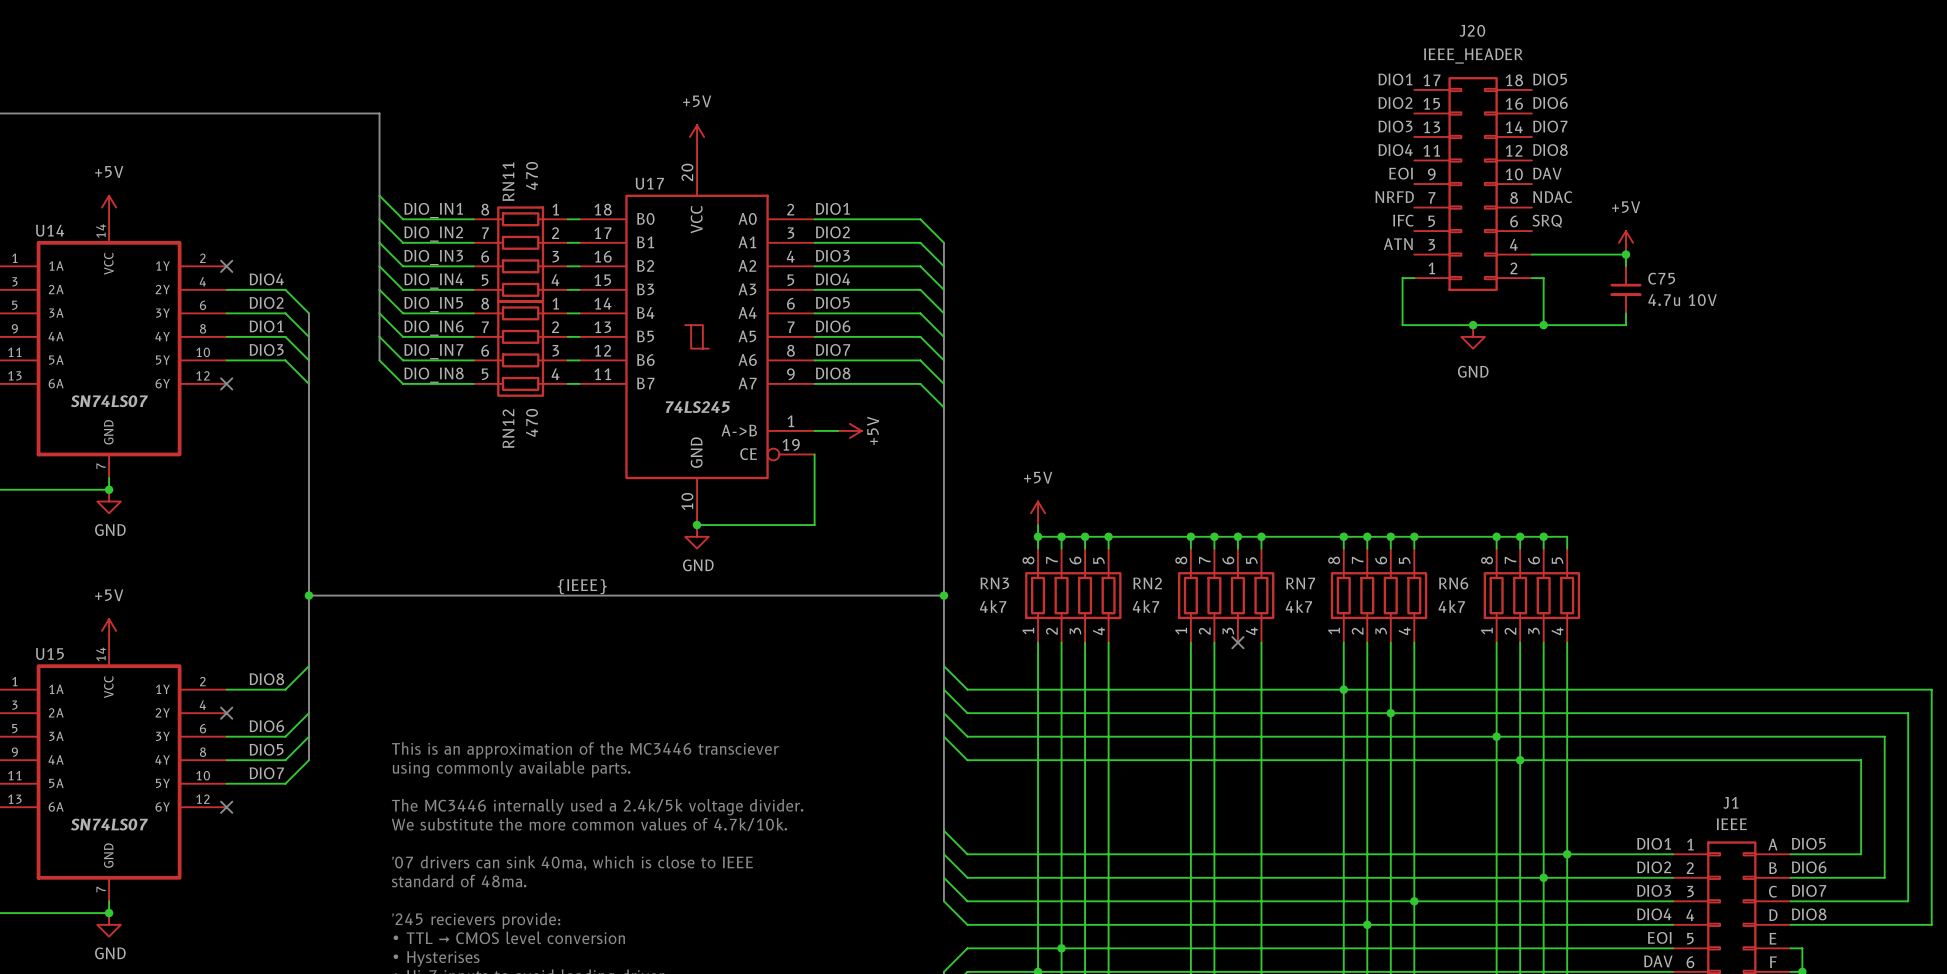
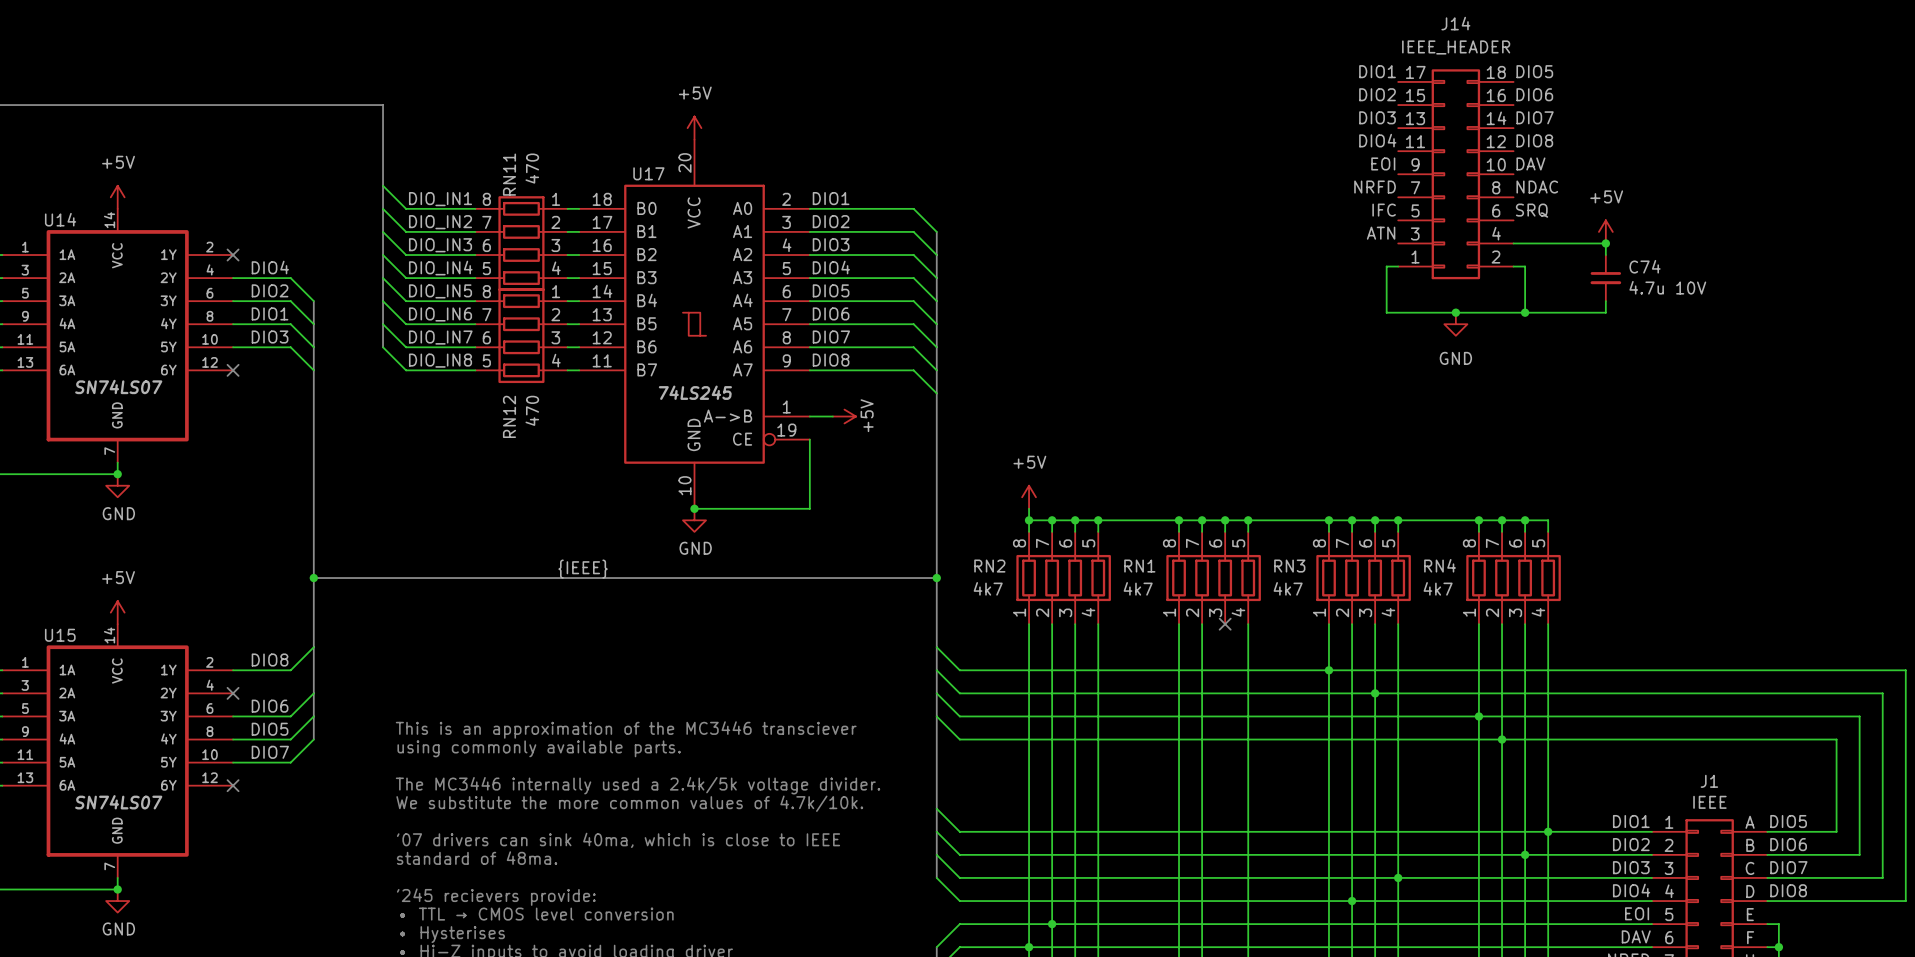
J20 name: J20 (1472, 30) -> J14 (1455, 23)
C75 name: C75 (1661, 278) -> C74 (1645, 266)
RN3 name: RN3 (994, 583) -> RN2 (989, 566)
RN2 name: RN2 (1147, 583) -> RN1 (1139, 566)
RN7 name: RN7 (1300, 583) -> RN3 (1289, 566)
RN6 name: RN6 (1453, 583) -> RN4 (1440, 565)

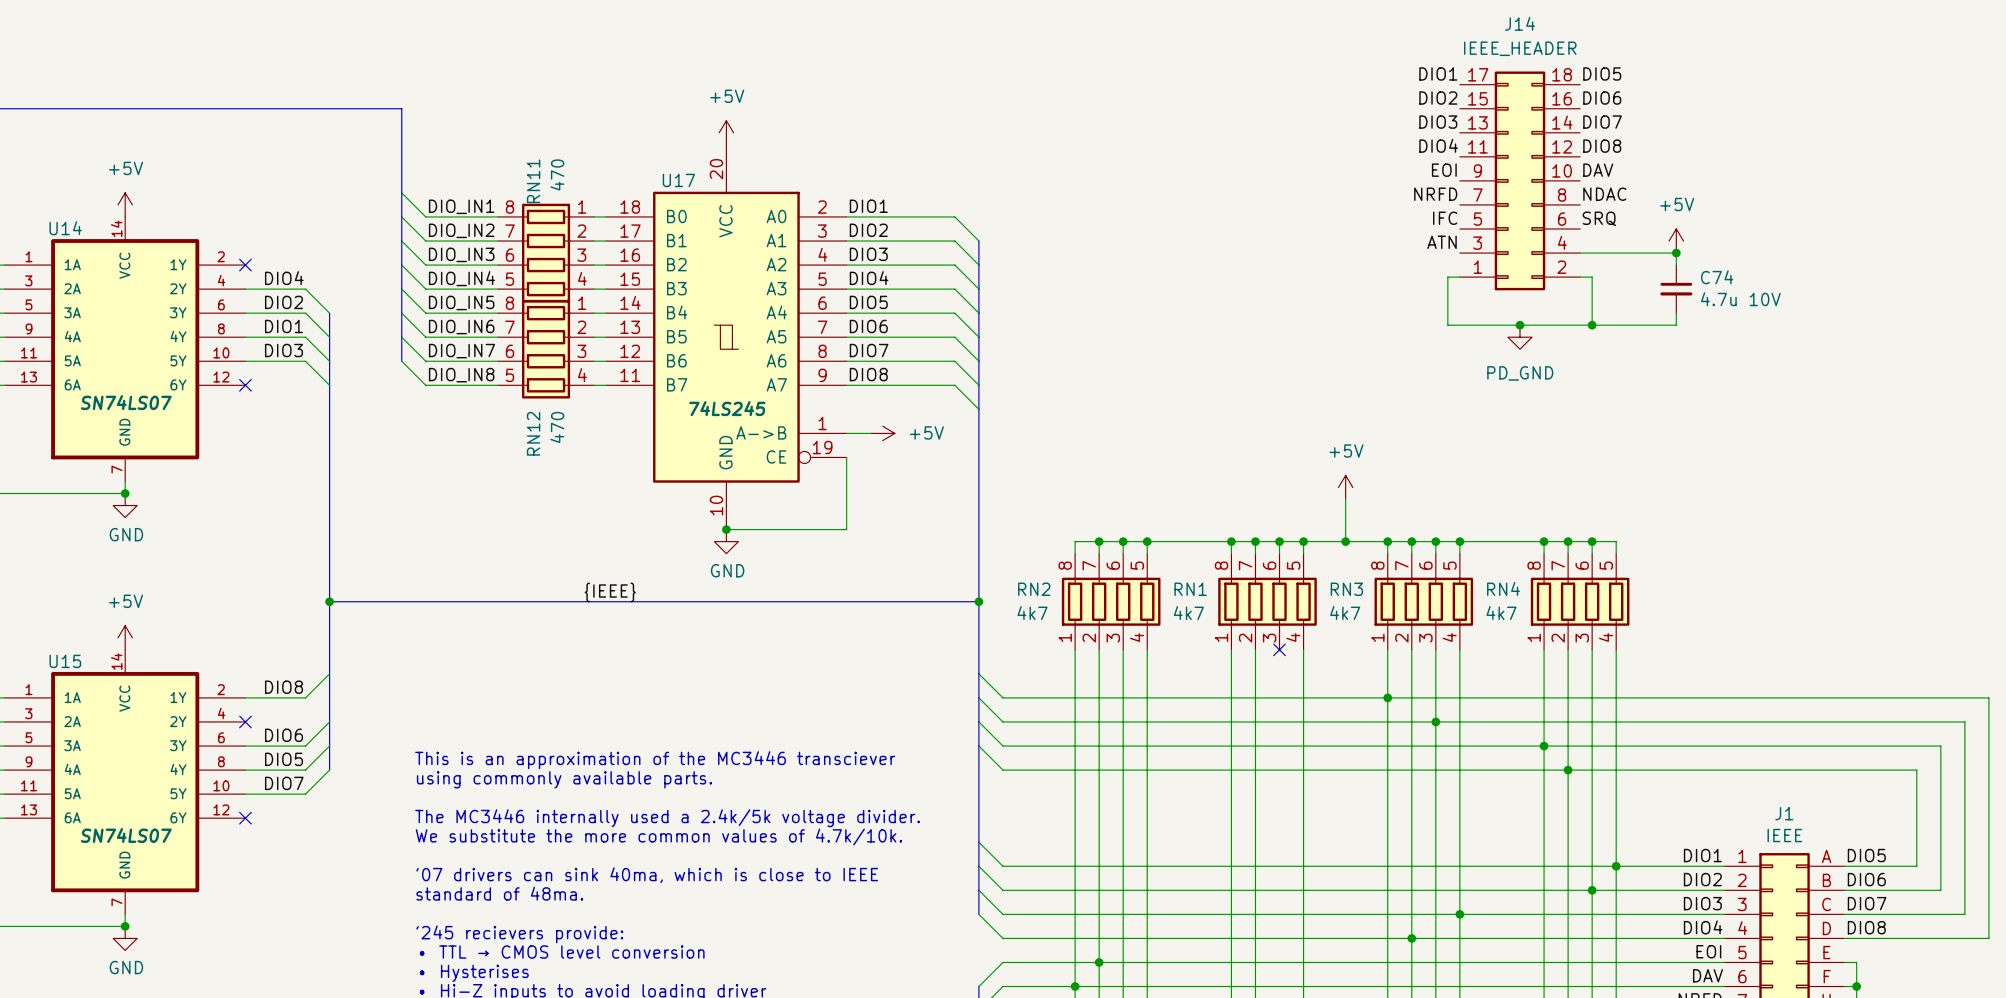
power symbol: GND (1455, 324) -> PD_GND (1520, 337)
power symbol text rotation: 0° (867, 415) -> 90° clockwise (926, 432)
power symbol: none -> +5V (1345, 487)
wire: none -> (1345, 499) (1345, 541)
power symbol: +5V (1029, 497) -> none
wire: (1029, 508) (1029, 520) -> none
junction: (1029, 520) -> none
junction: none -> (1345, 541)

